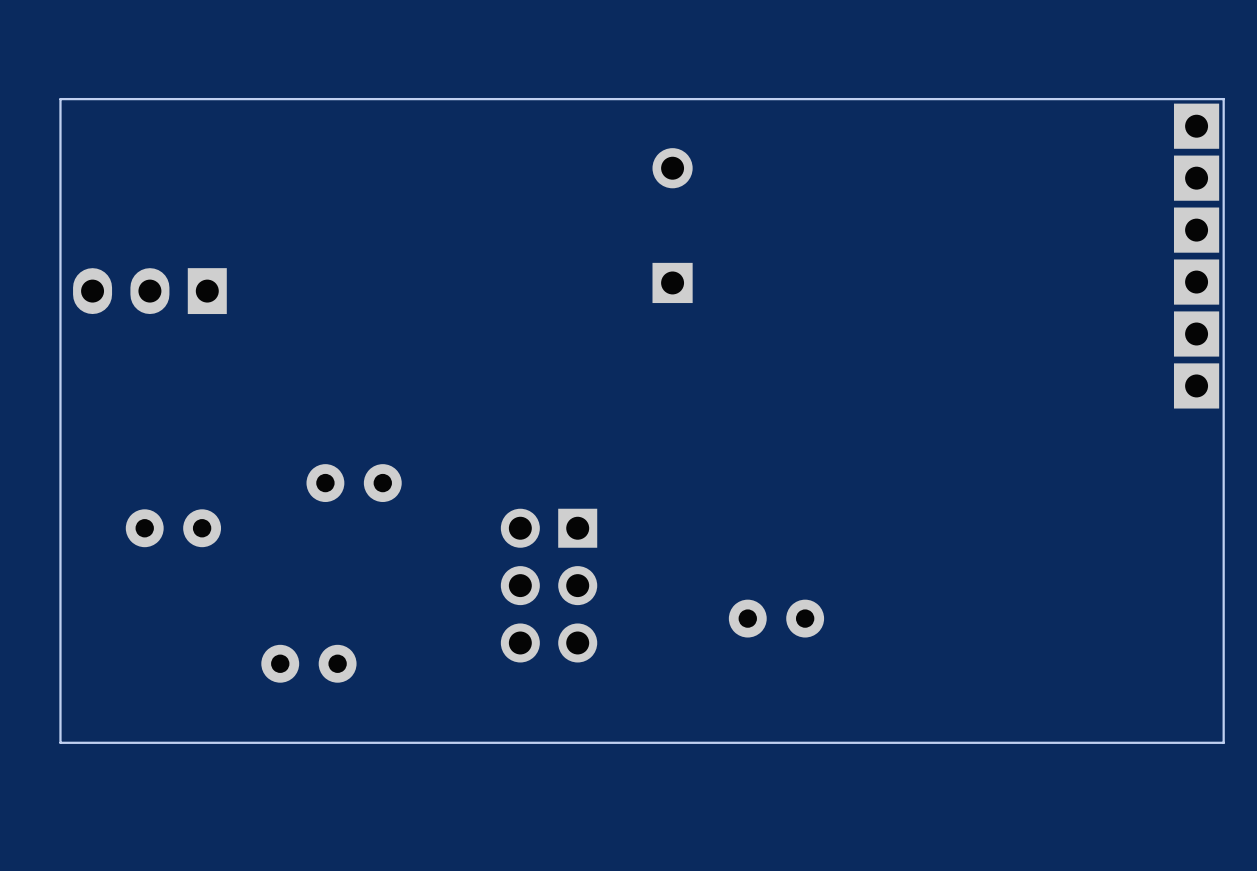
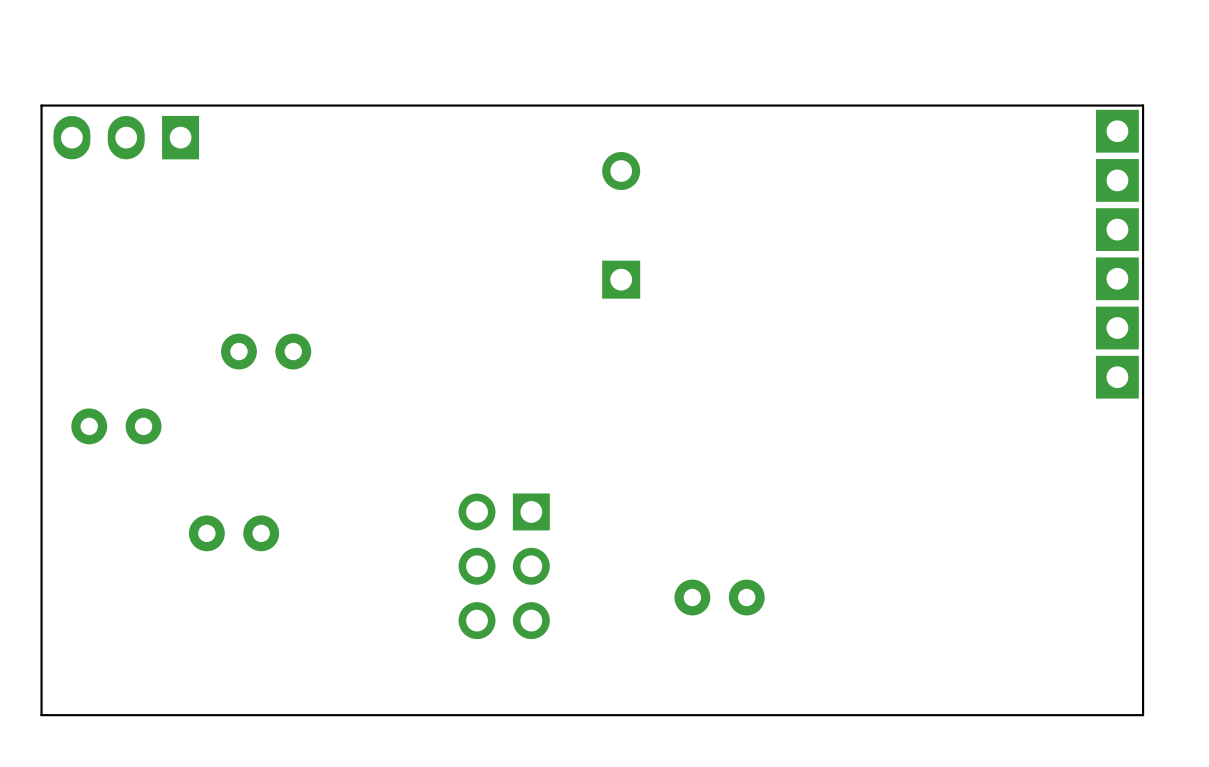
part position: (149, 291) -> (126, 137)
part: none -> (266, 351)
part: none -> (116, 426)
part: (354, 483) -> none
part: (173, 528) -> none
part: none -> (234, 533)
part: (308, 663) -> none

